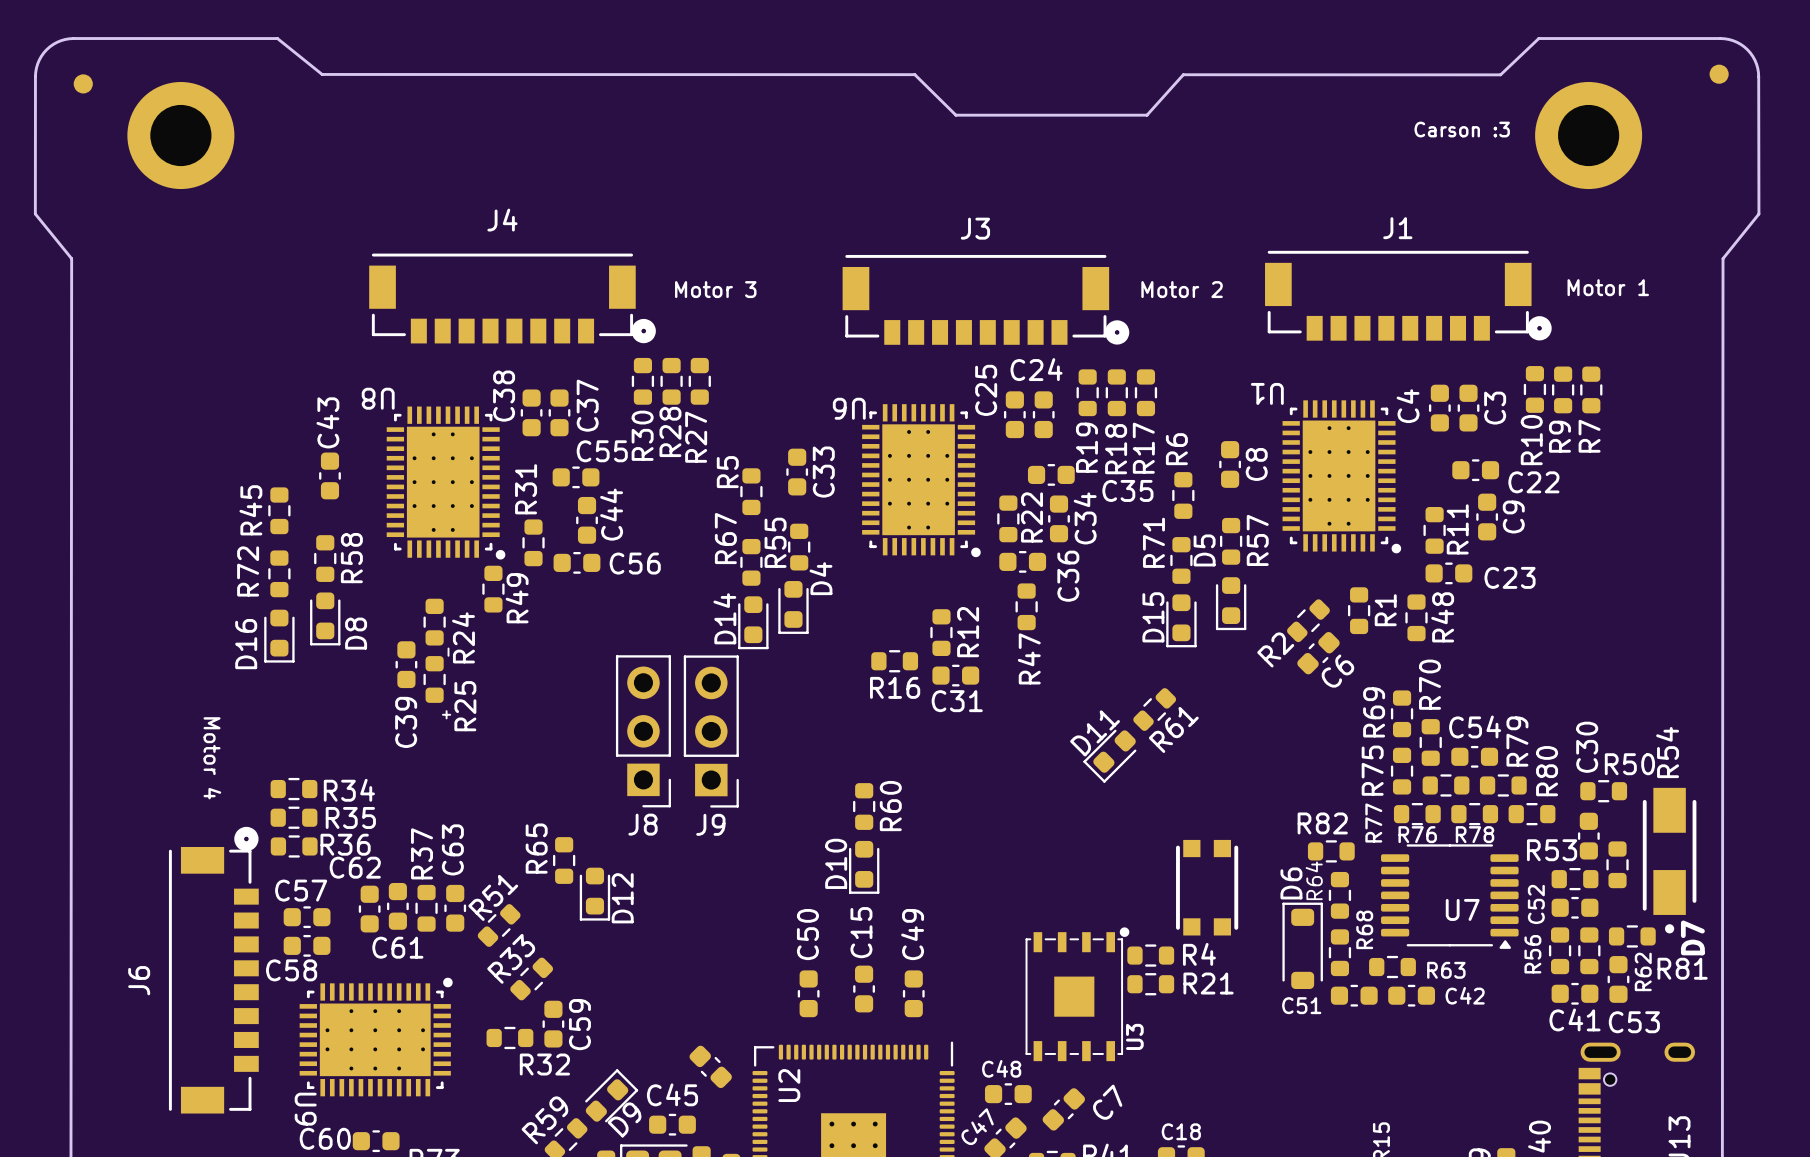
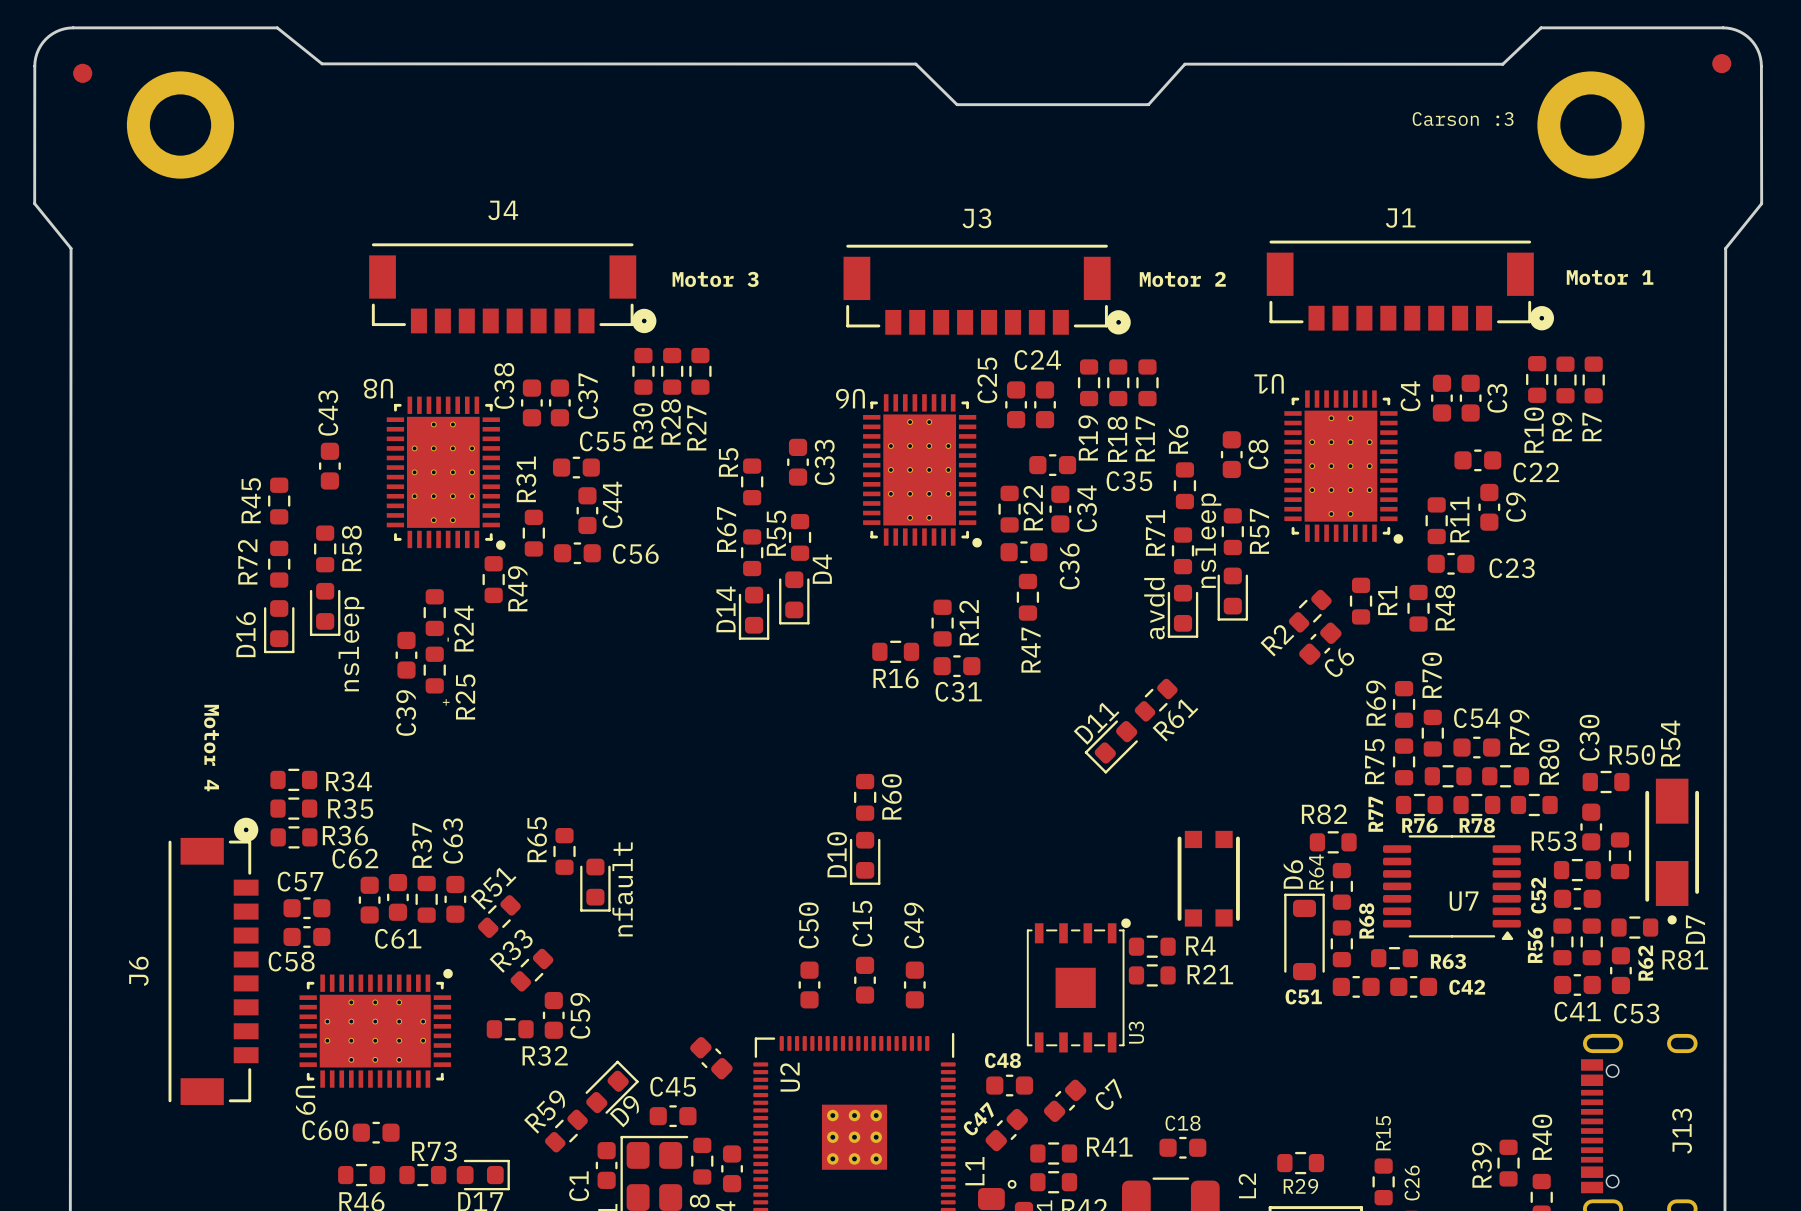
D5 name: D5 (1204, 550) -> nsleep (1208, 540)
D15 name: D15 (1153, 617) -> avdd (1154, 608)
D8 name: D8 (356, 633) -> nsleep (351, 644)
J8: (643, 731) -> none
J9: (711, 731) -> none
D12 name: D12 (622, 898) -> nfault (622, 889)

